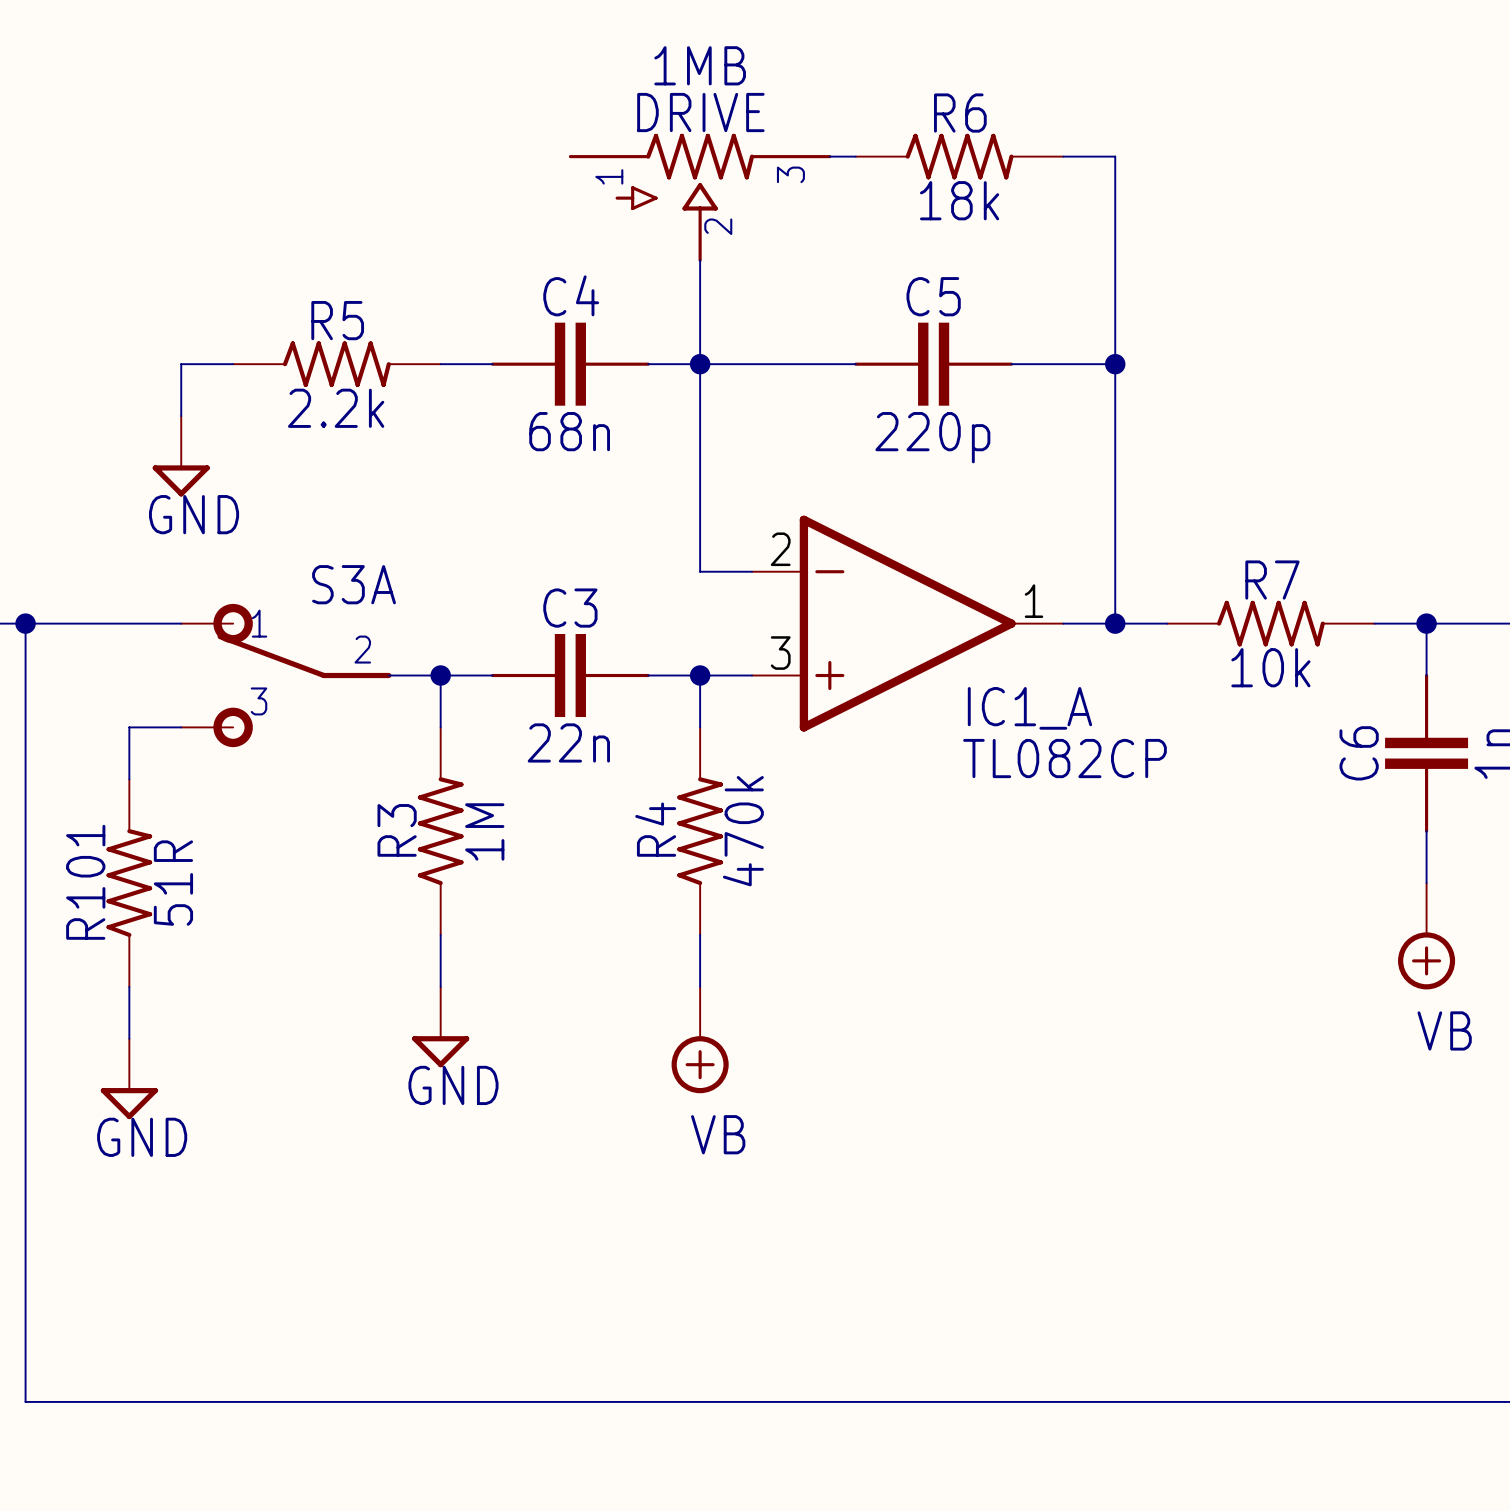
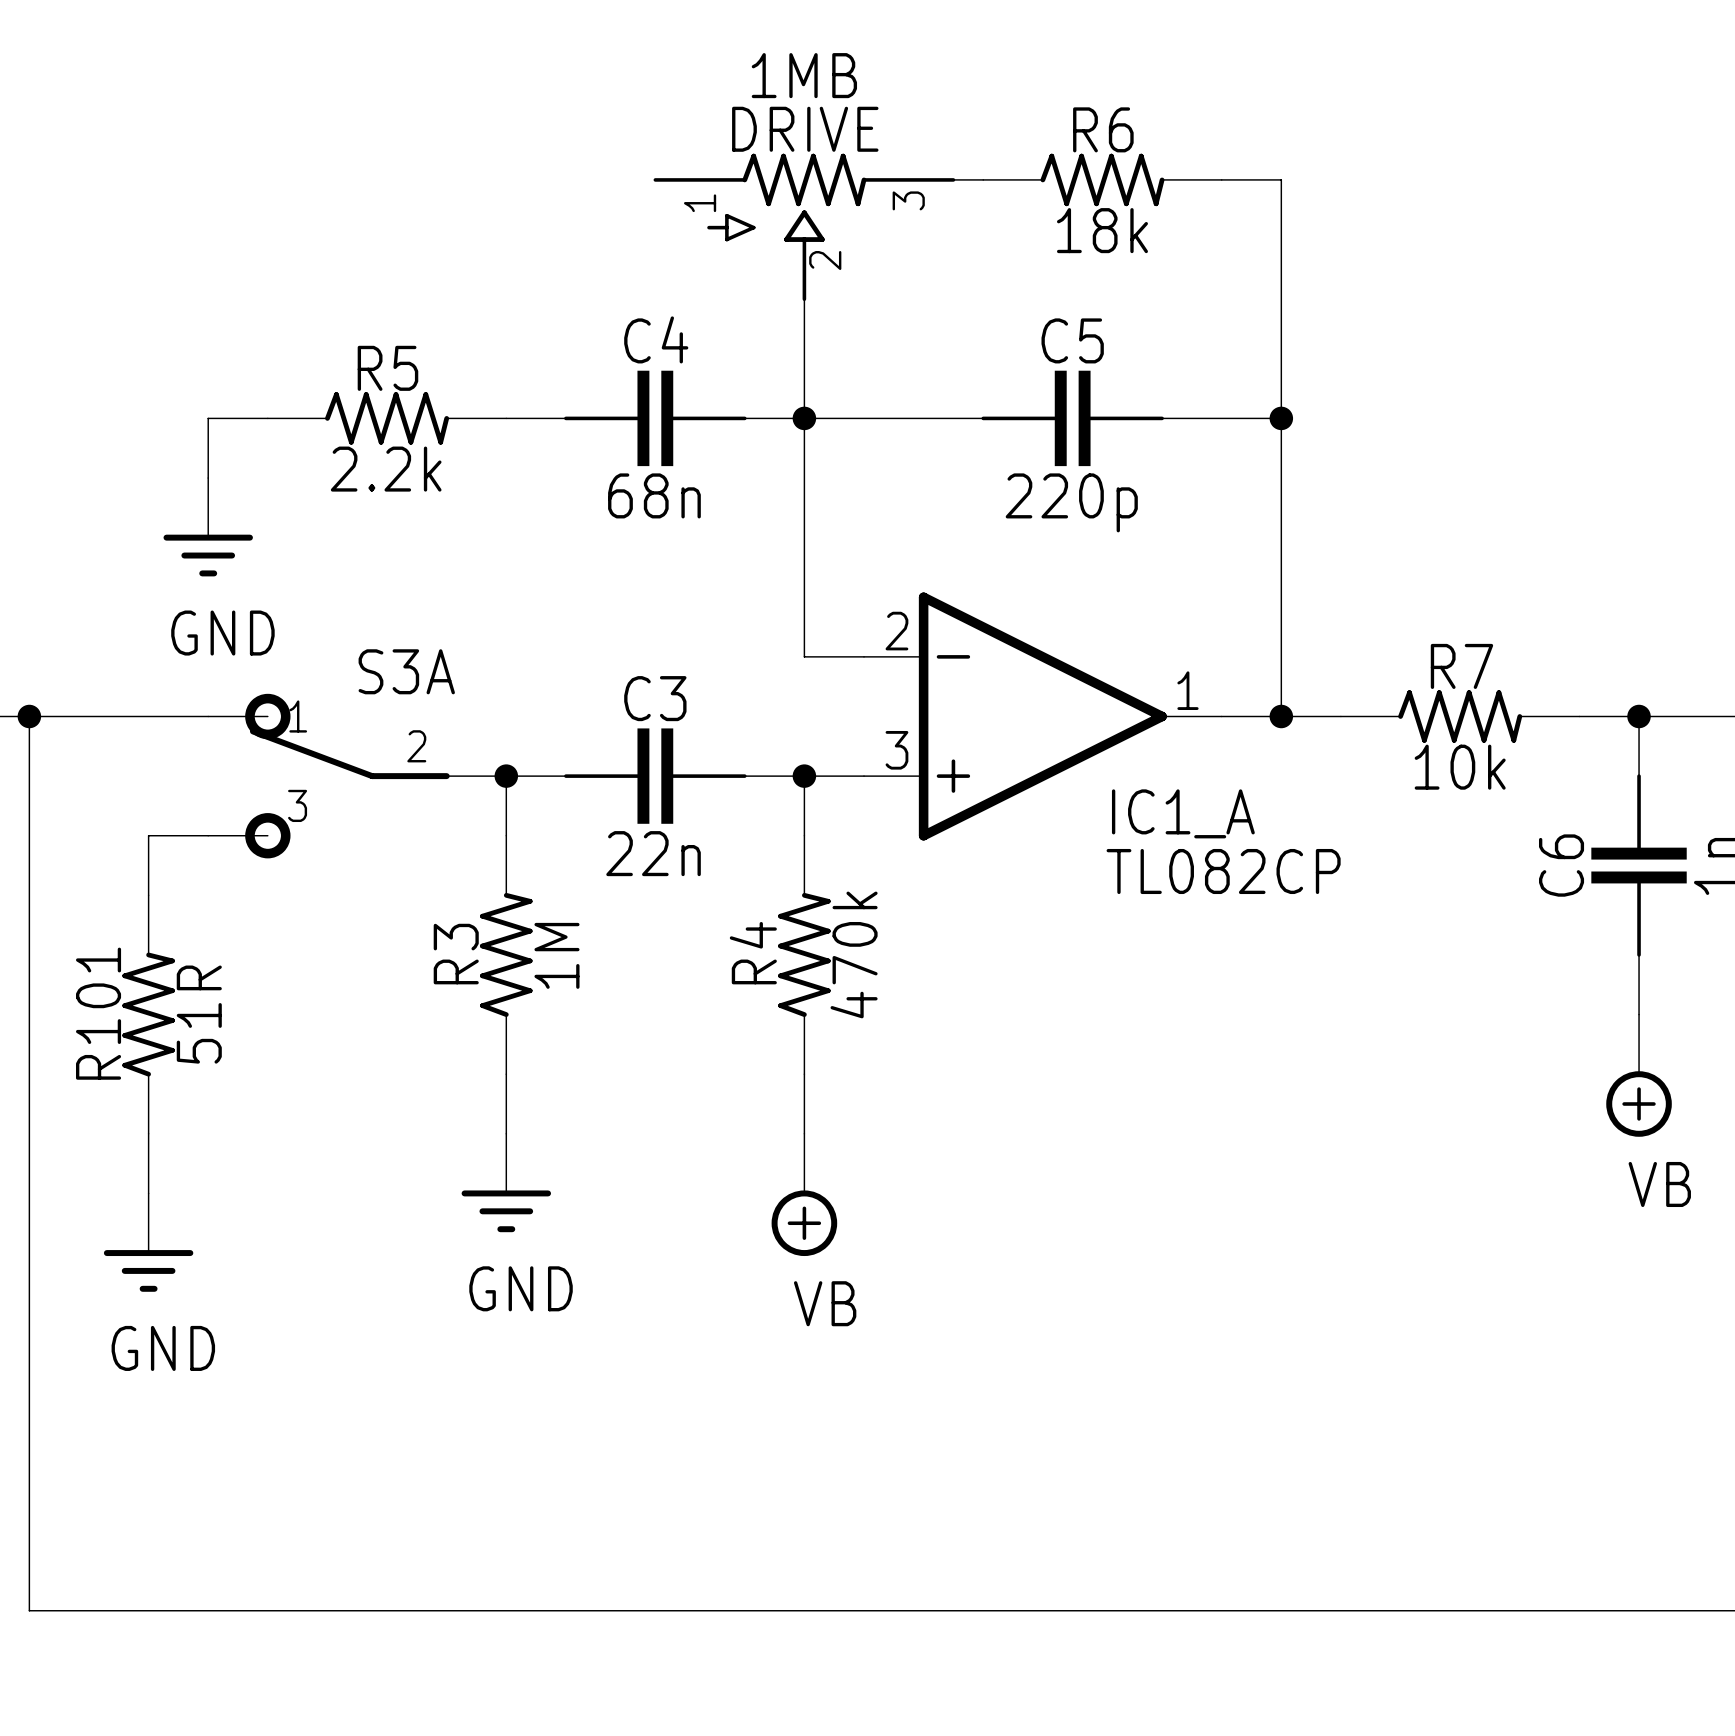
power symbol shape: [152, 416, 210, 497] -> [163, 478, 253, 577]
power symbol text position: GND (194, 514) -> GND (222, 633)
power symbol shape: [412, 986, 470, 1068] -> [461, 1133, 552, 1233]
power symbol shape: [100, 1038, 158, 1120] -> [103, 1193, 194, 1292]
power symbol text position: GND (453, 1085) -> GND (521, 1288)
power symbol text position: GND (142, 1137) -> GND (163, 1348)

